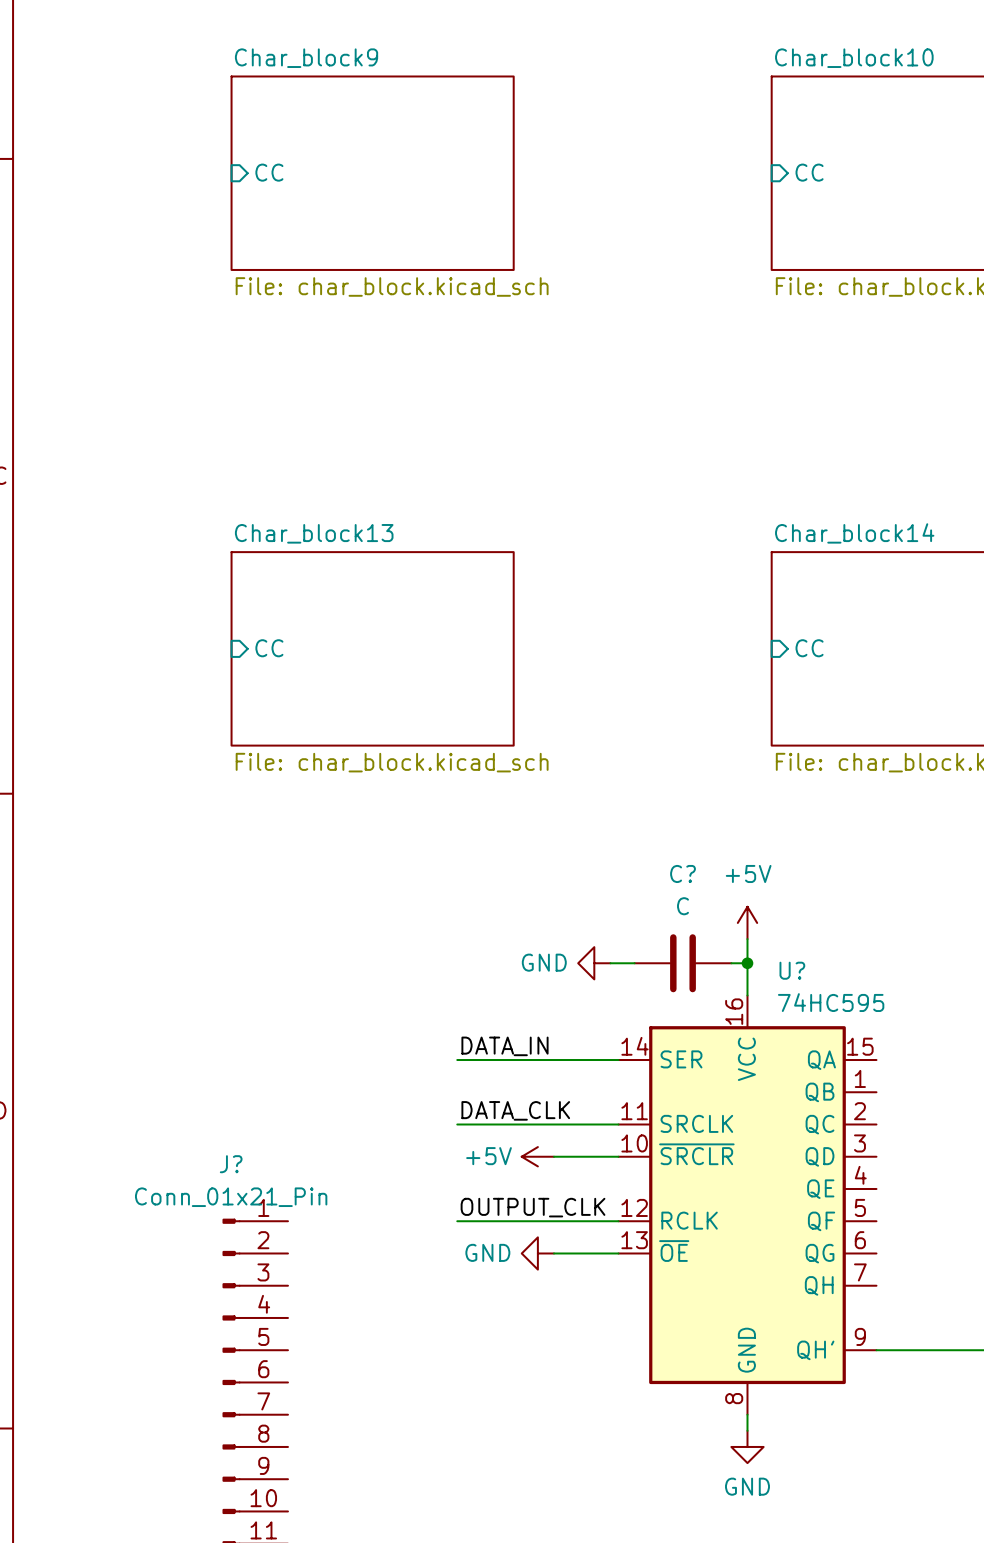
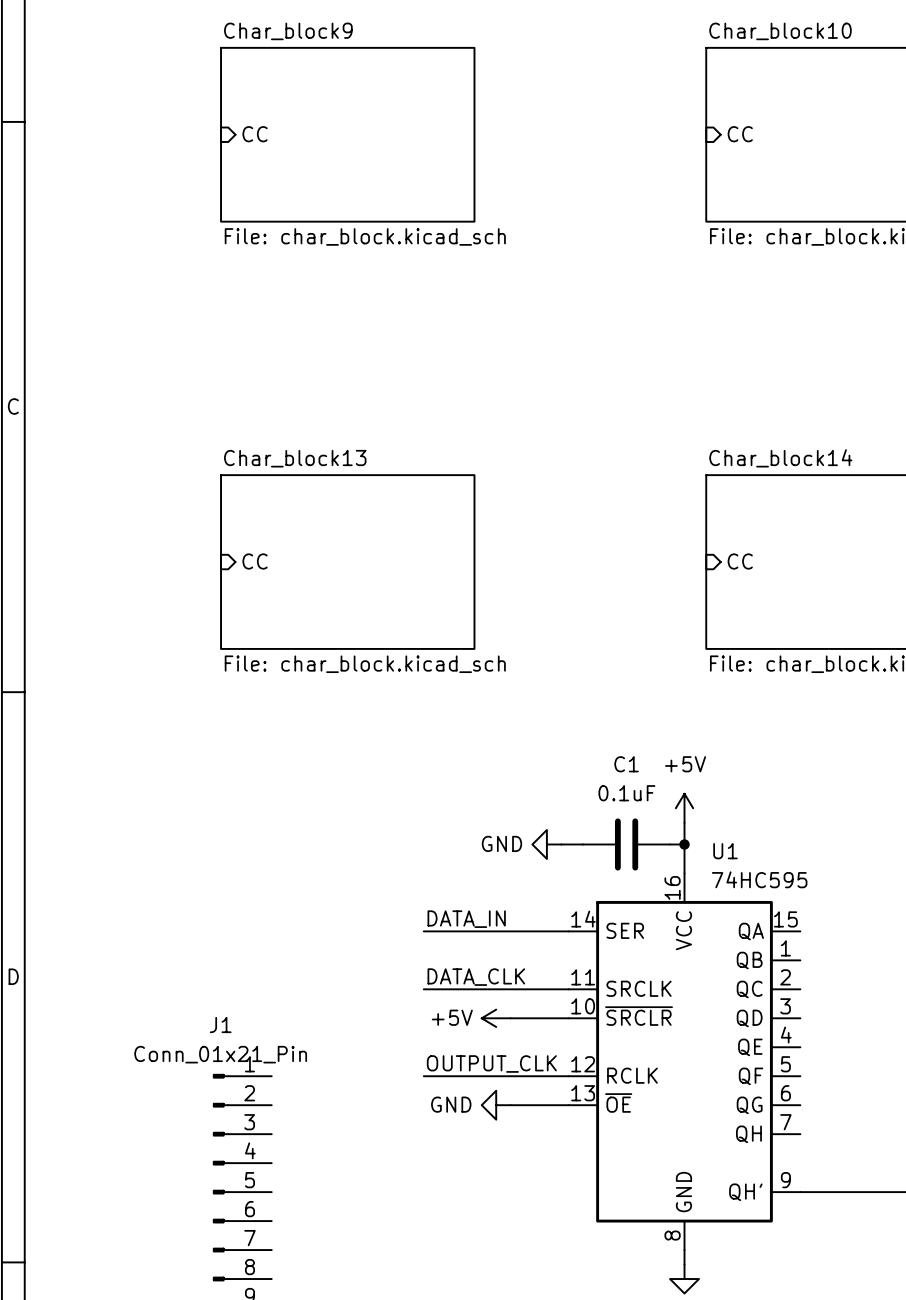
C? name: C? (683, 873) -> C1 (626, 764)
C? value: C (683, 906) -> 0.1uF (626, 793)
U? name: U? (792, 970) -> U1 (725, 851)
J? name: J? (231, 1164) -> J1 (220, 1024)

